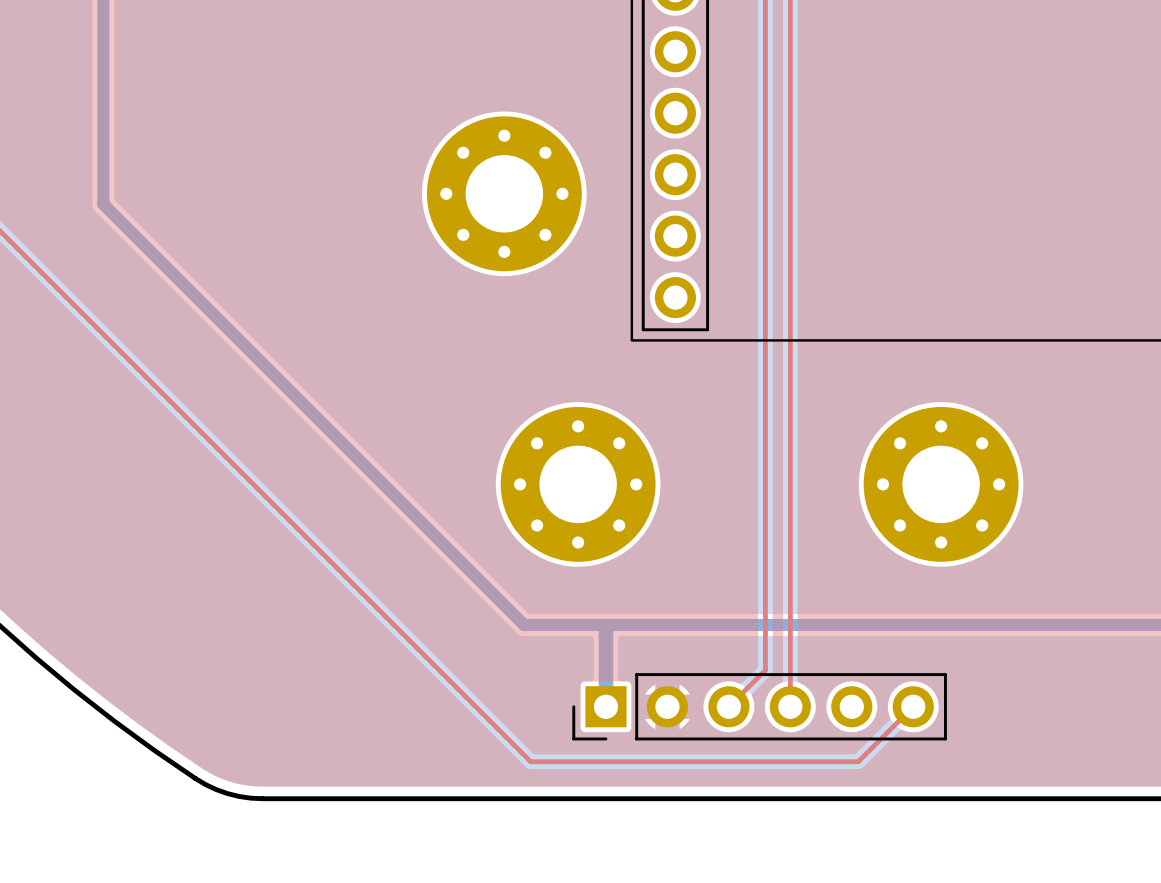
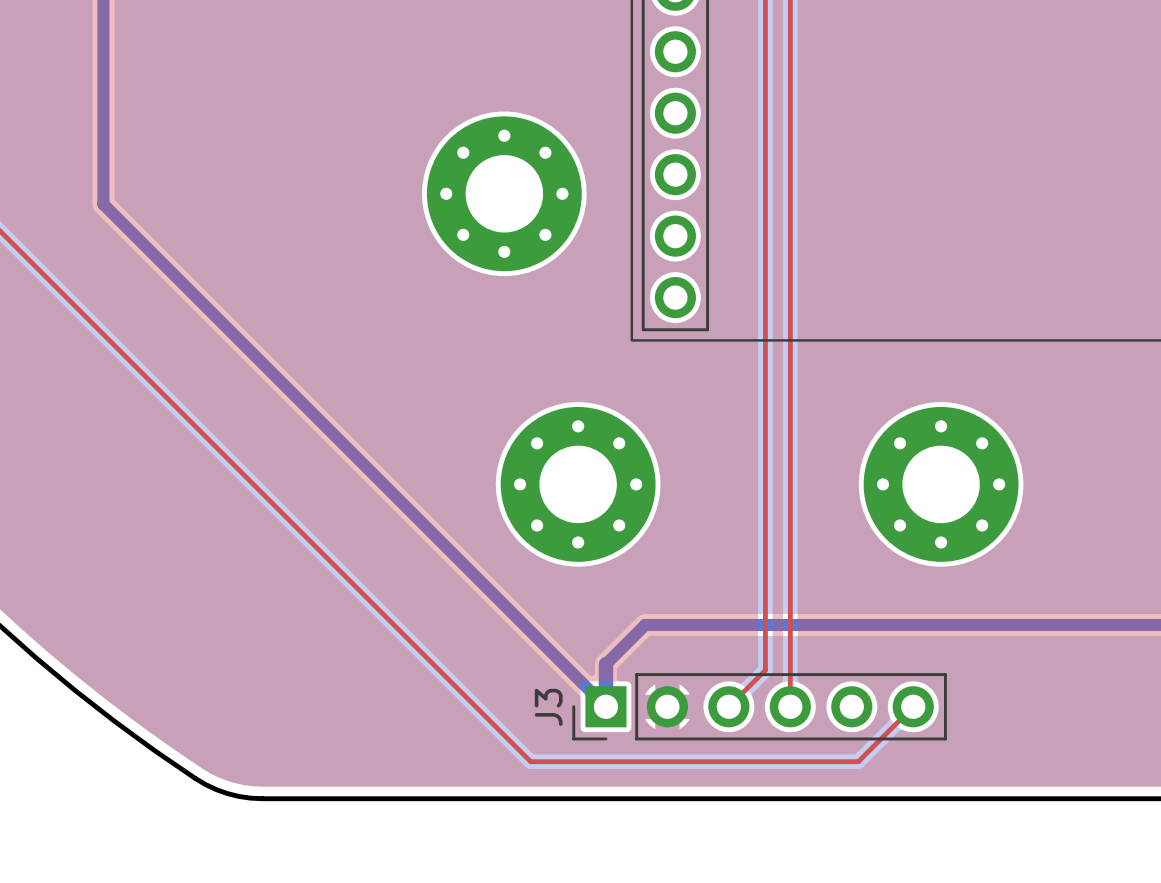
bottom track: (524, 624) (645, 624) -> (524, 624) (605, 706)
bottom track: (605, 628) (605, 664) -> (645, 624) (605, 664)
J3 name: none -> J3 (548, 707)

